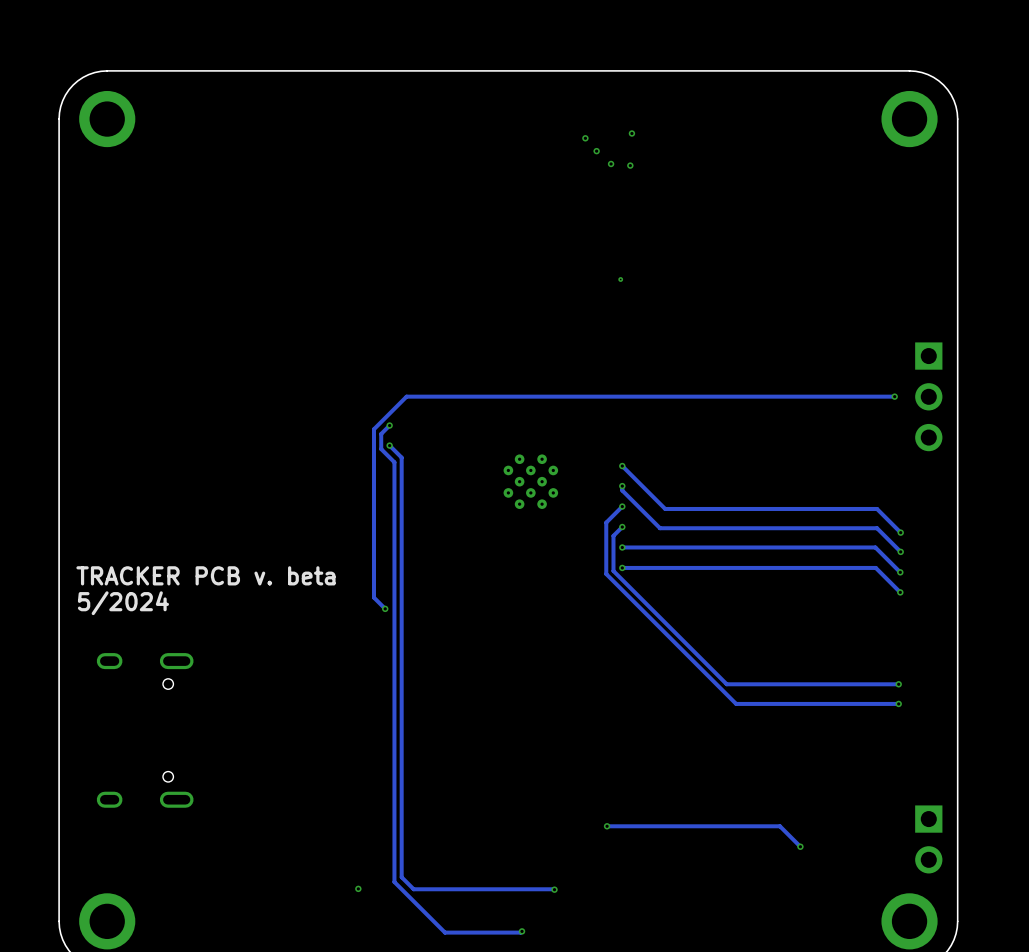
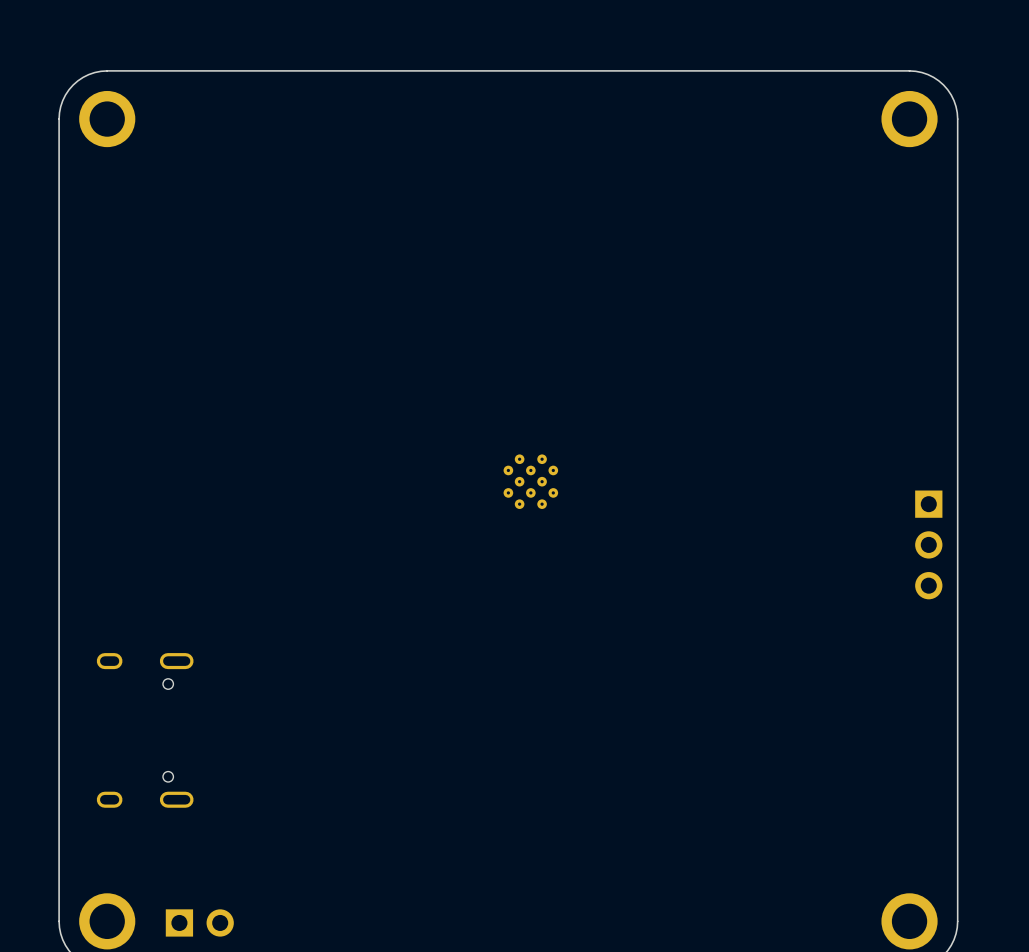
via: (631, 133) -> none
via: (585, 138) -> none
via: (596, 151) -> none
via: (611, 163) -> none
via: (630, 165) -> none
via: (620, 279) -> none
track: (894, 396) (406, 396) (373, 429) (373, 597) (385, 608) -> none
via: (894, 396) -> none
part position: (928, 396) -> (928, 544)
track: (389, 425) (381, 433) (381, 449) (394, 462) (394, 882) (445, 932) (522, 931) -> none
via: (389, 425) -> none
track: (389, 445) (401, 457) (401, 877) (413, 889) (554, 889) -> none
via: (389, 445) -> none
track: (622, 466) (665, 508) (877, 508) (900, 532) -> none
via: (622, 466) -> none
track: (622, 486) (622, 490) (660, 528) (877, 528) (900, 551) -> none
via: (622, 486) -> none
track: (622, 506) (606, 522) (606, 574) (736, 703) (898, 703) -> none
via: (622, 506) -> none
track: (622, 527) (613, 535) (613, 571) (726, 684) (898, 684) -> none
via: (622, 527) -> none
via: (900, 532) -> none
track: (622, 547) (875, 547) (900, 572) -> none
via: (622, 547) -> none
via: (900, 551) -> none
track: (622, 567) (875, 567) (900, 592) -> none
via: (622, 567) -> none
via: (900, 572) -> none
text: TRACKER PCB v. beta (205, 575) -> none
via: (900, 592) -> none
text: 5/2024 (123, 603) -> none
via: (385, 608) -> none
via: (898, 684) -> none
via: (898, 703) -> none
track: (607, 826) (779, 826) (800, 846) -> none
via: (607, 826) -> none
part: (928, 839) -> none
via: (800, 846) -> none
via: (358, 888) -> none
via: (554, 889) -> none
part: none -> (199, 922)
via: (522, 931) -> none

